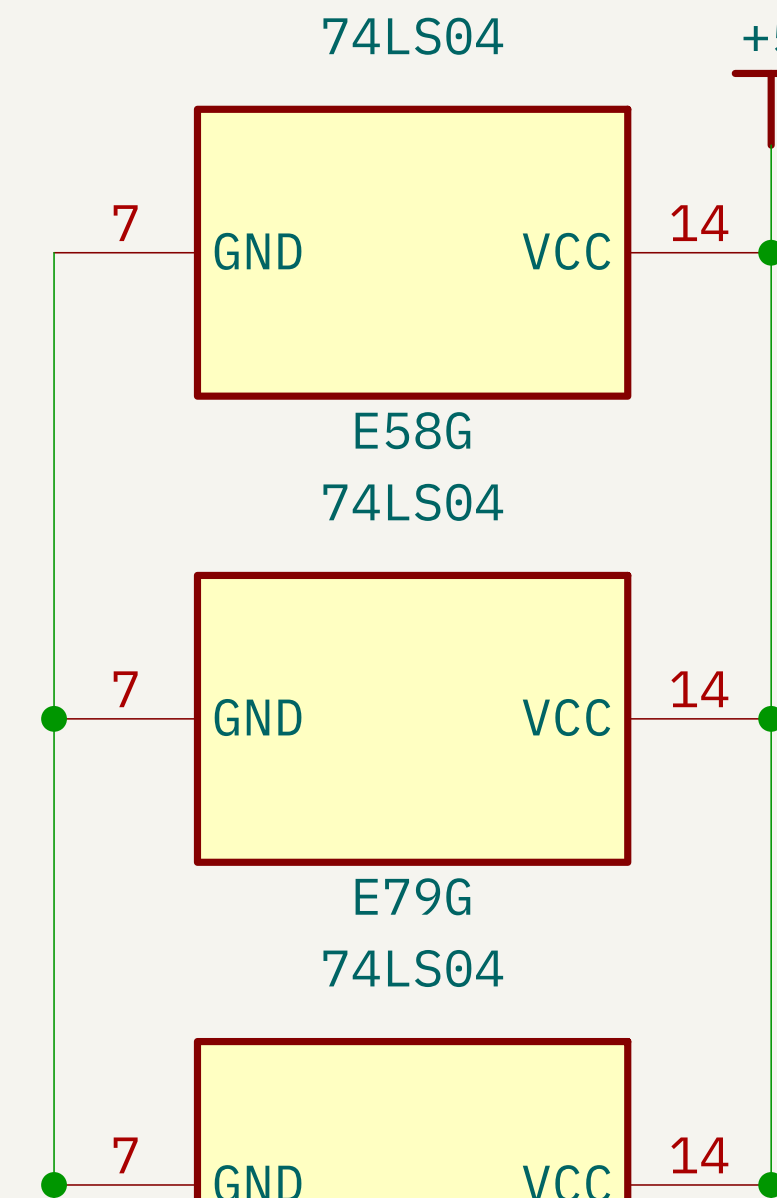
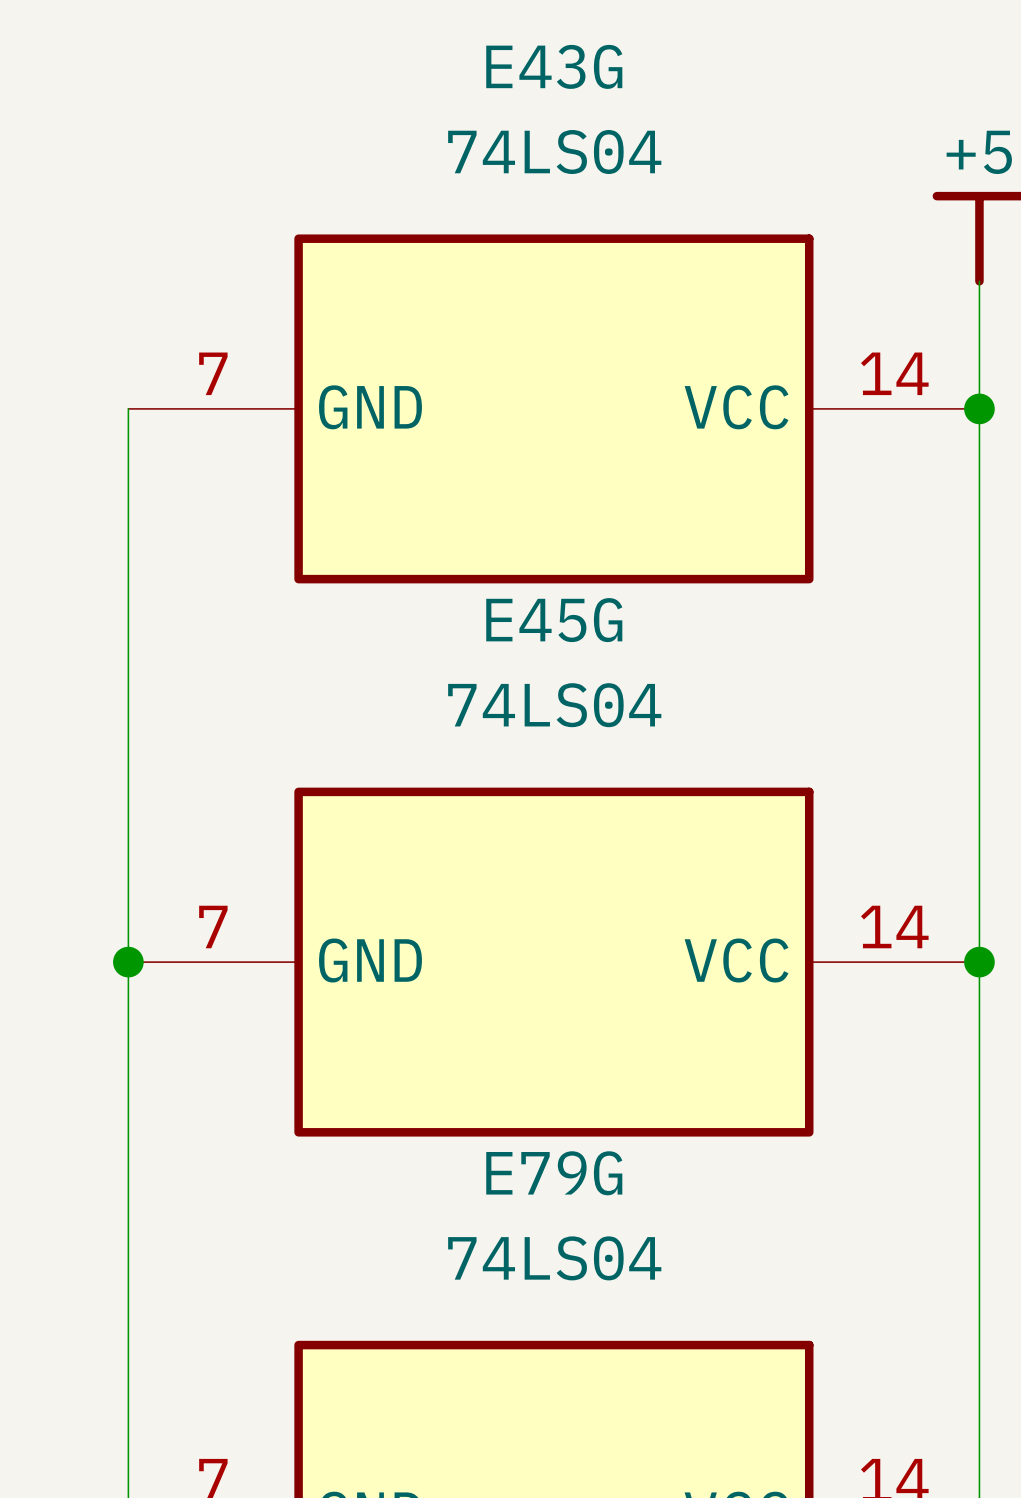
E58G name: E58G (412, 430) -> E45G (554, 620)

